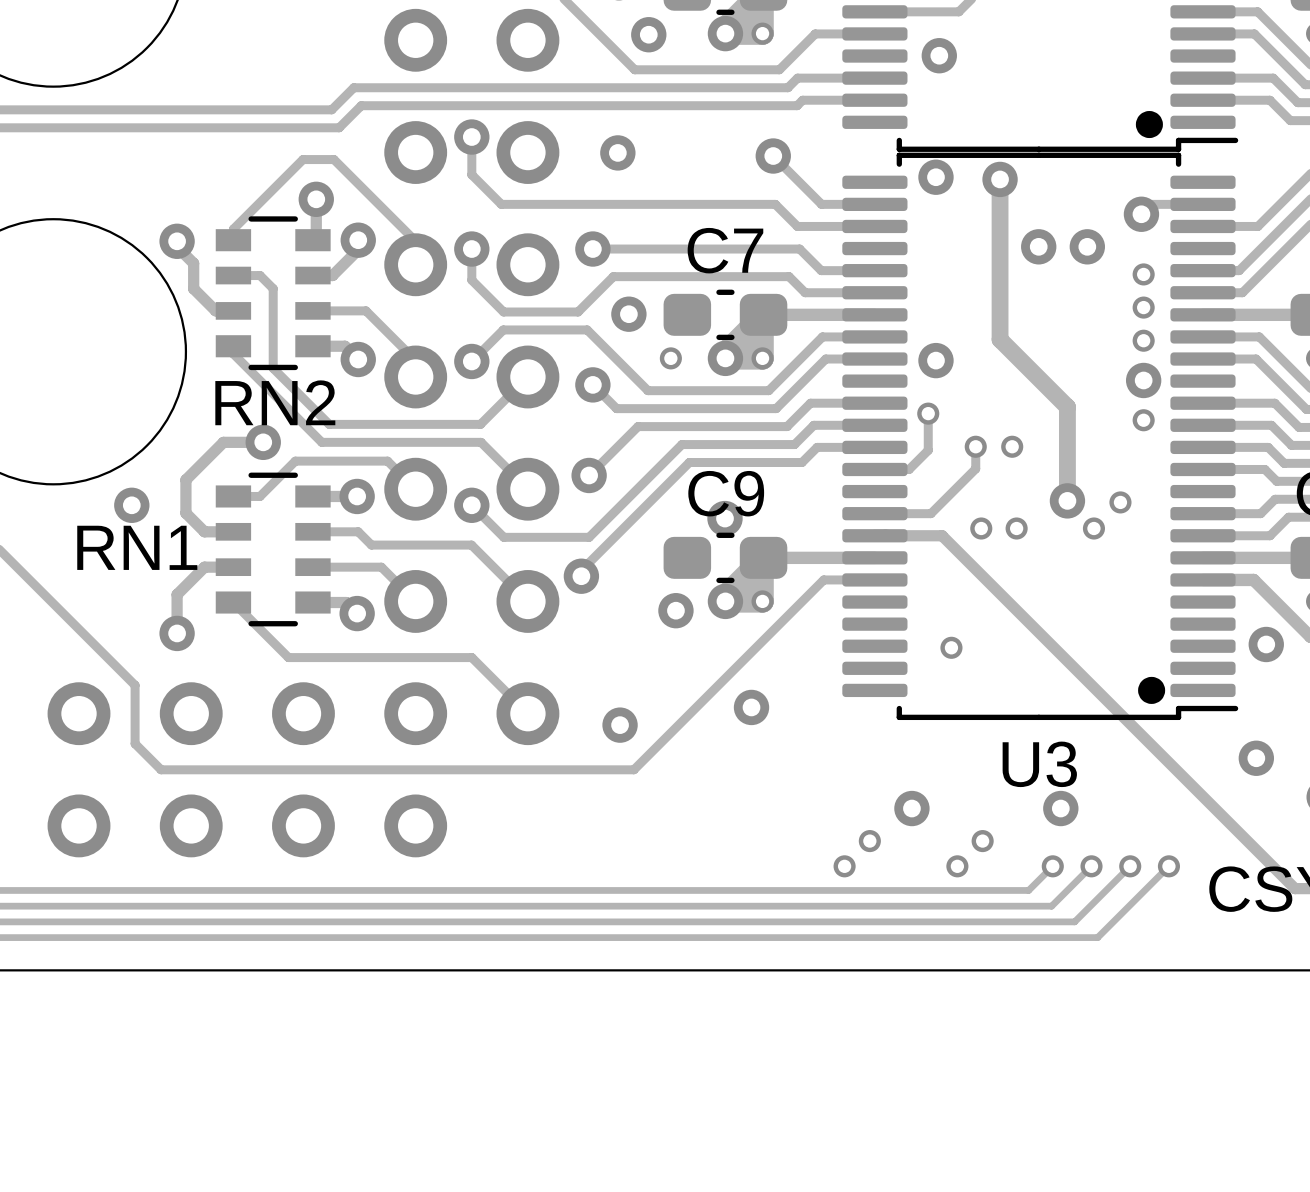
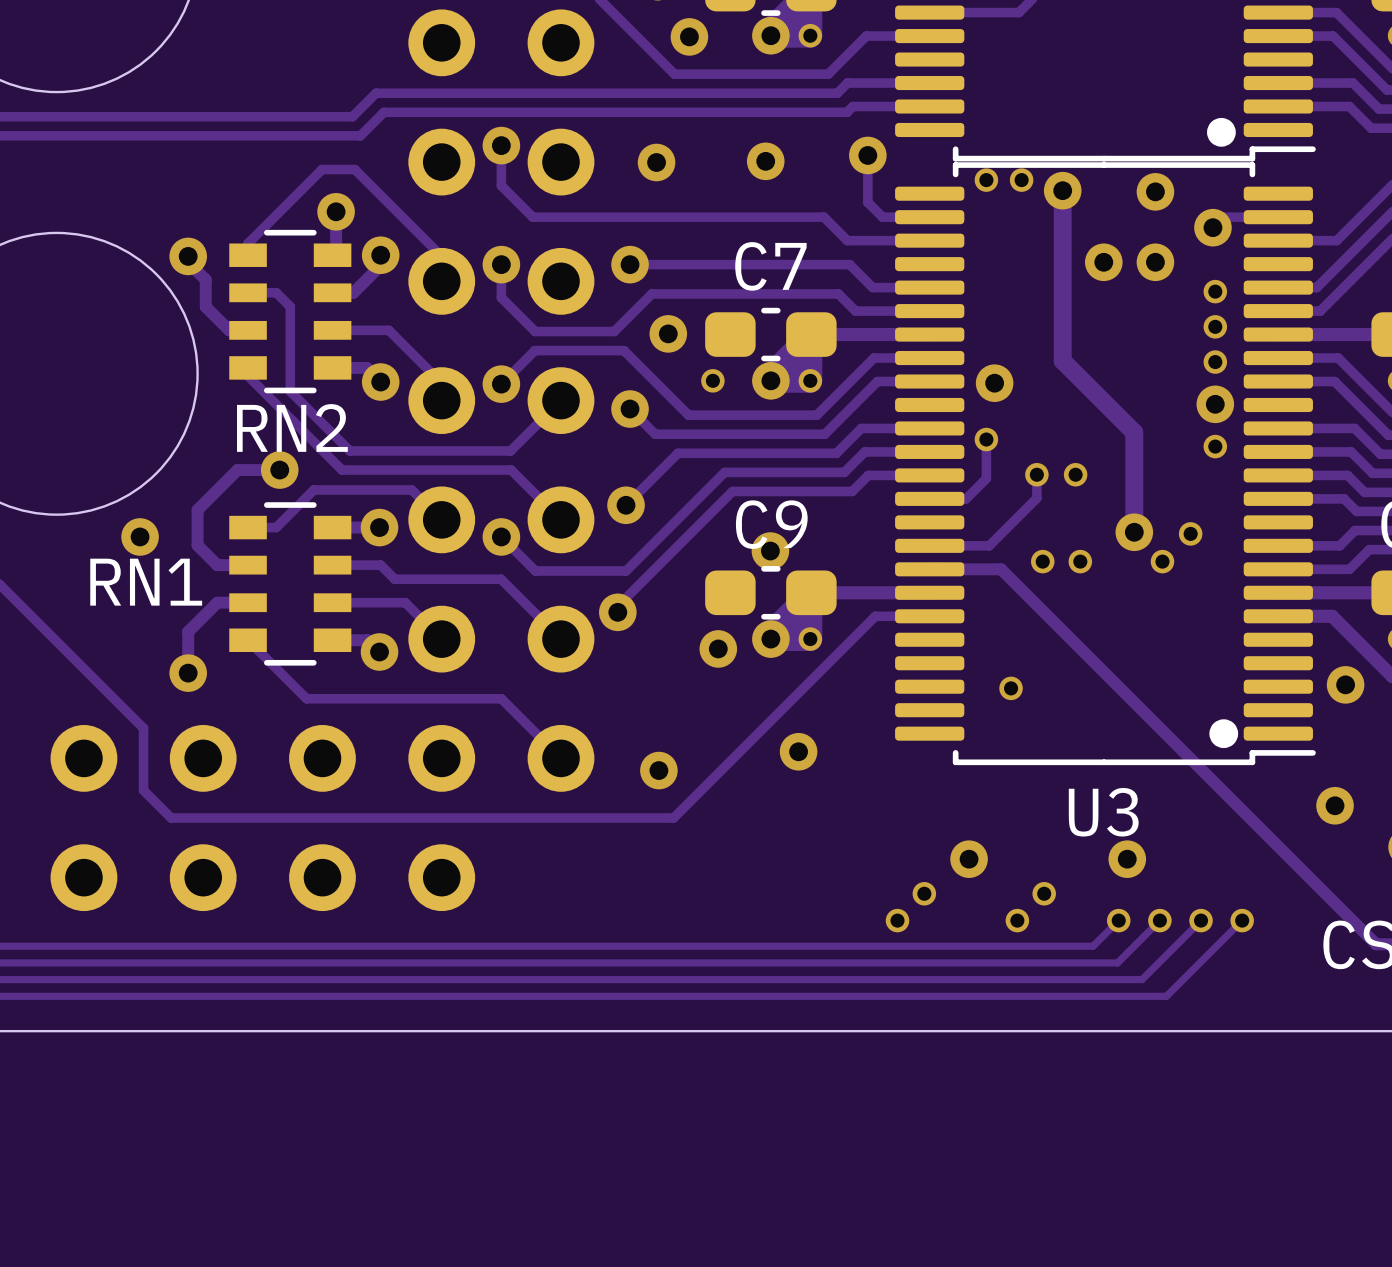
via: (939, 55) -> none
via: none -> (867, 155)
via: none -> (765, 161)
track: (773, 156) (821, 204) (830, 204) -> (867, 155) (867, 202) (882, 217)
via: (773, 156) -> none
via size: [918, 159, 954, 195] -> [974, 168, 999, 192]
via: none -> (1021, 180)
via: none -> (1155, 191)

